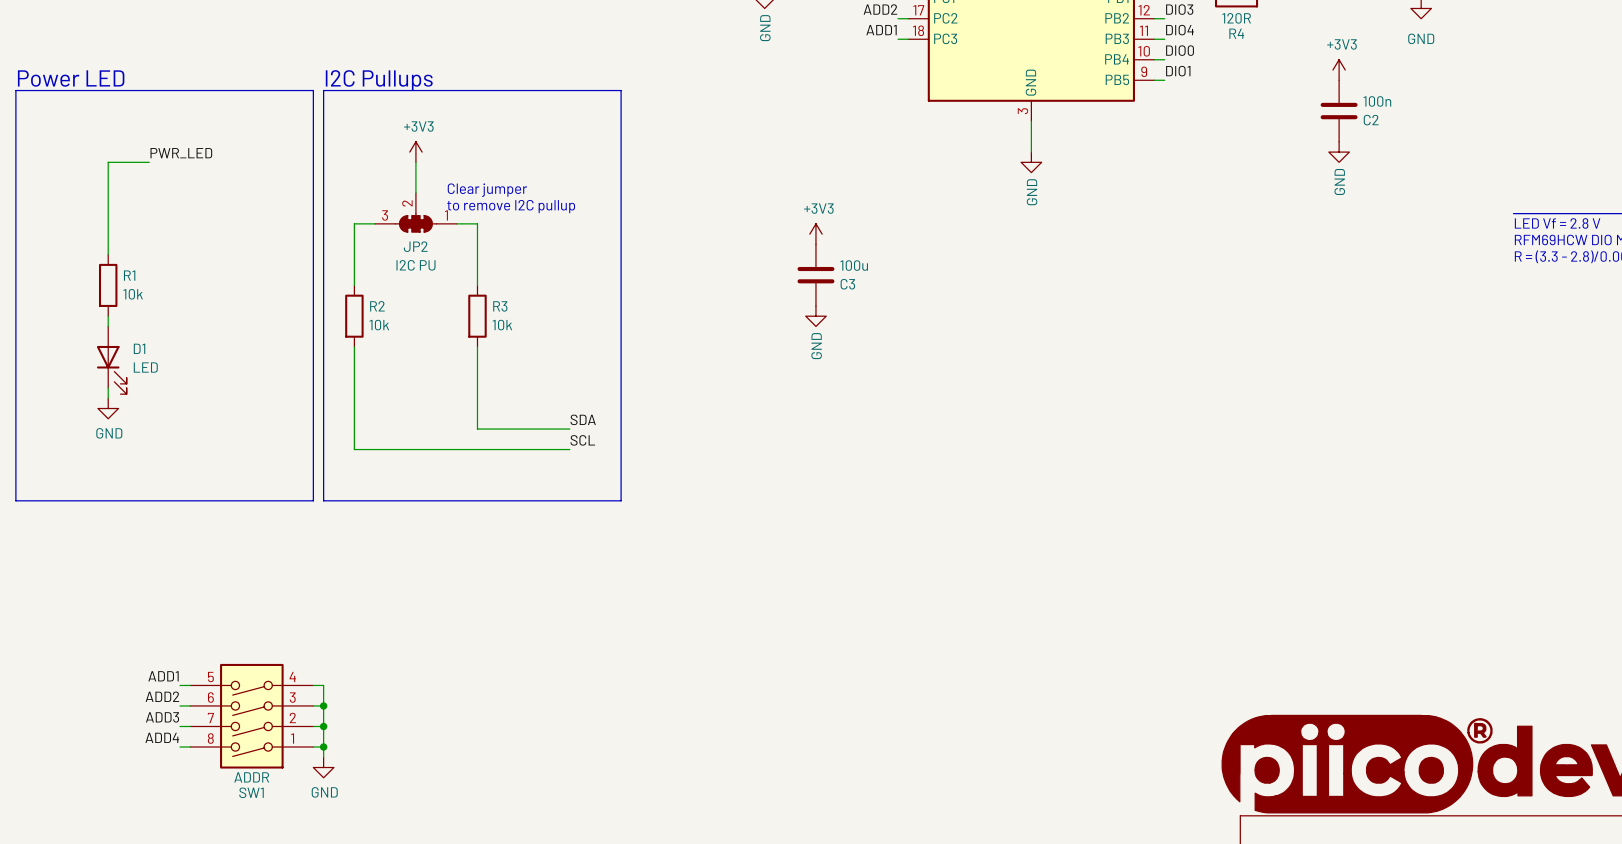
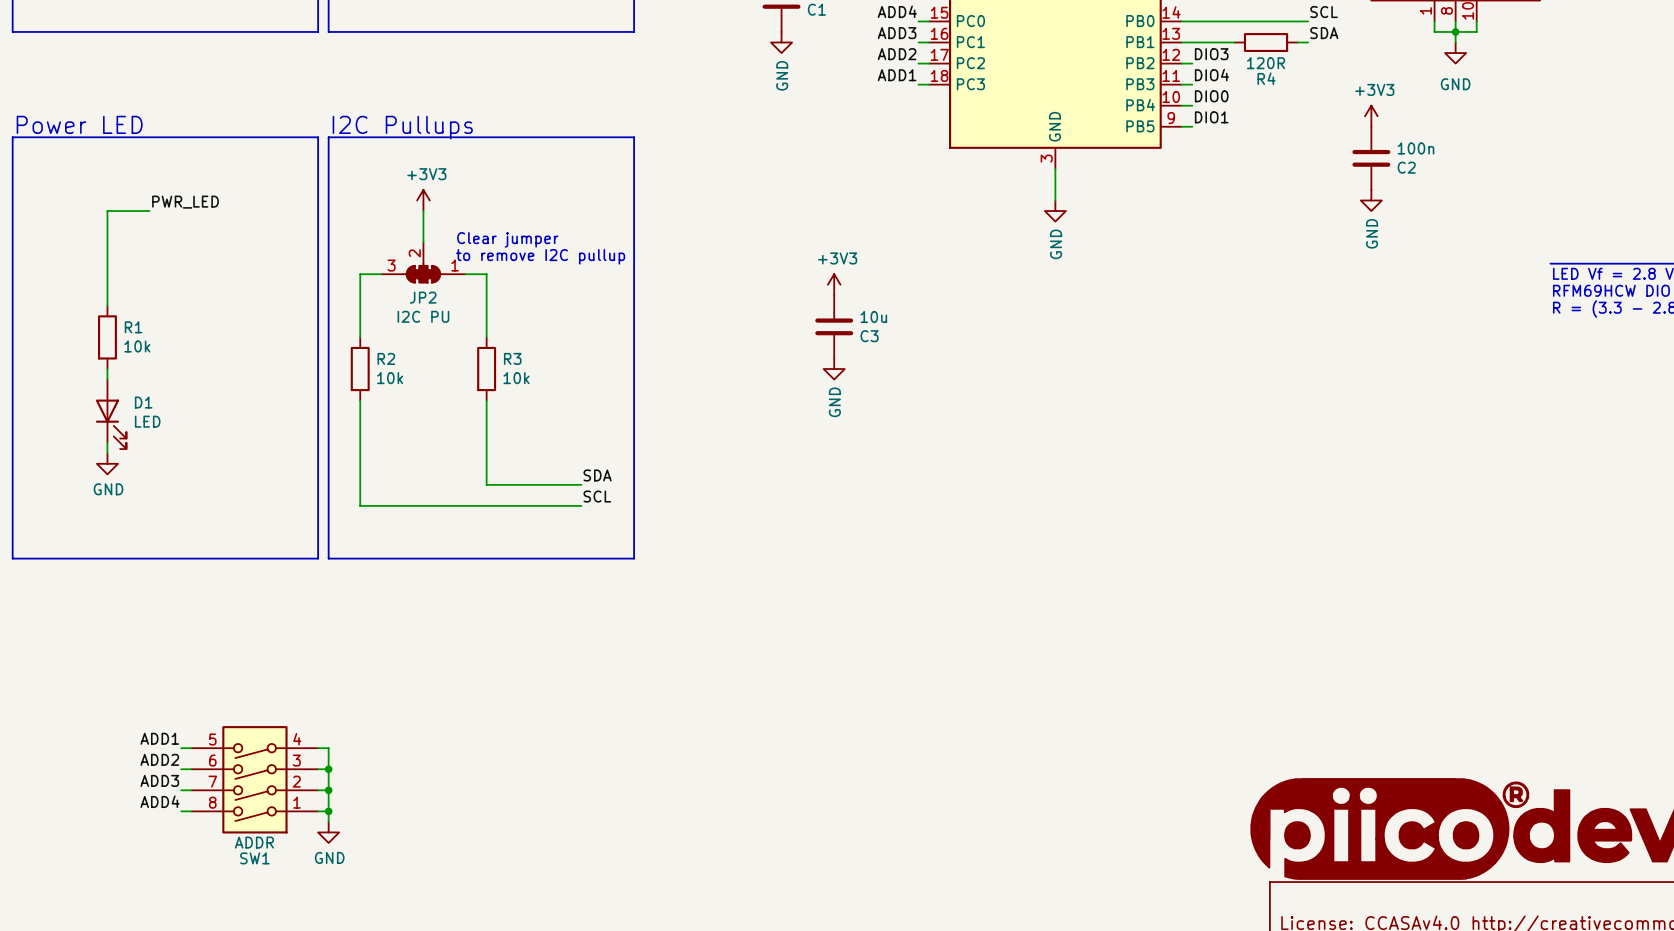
C3 value: 100u (854, 265) -> 10u (873, 317)

